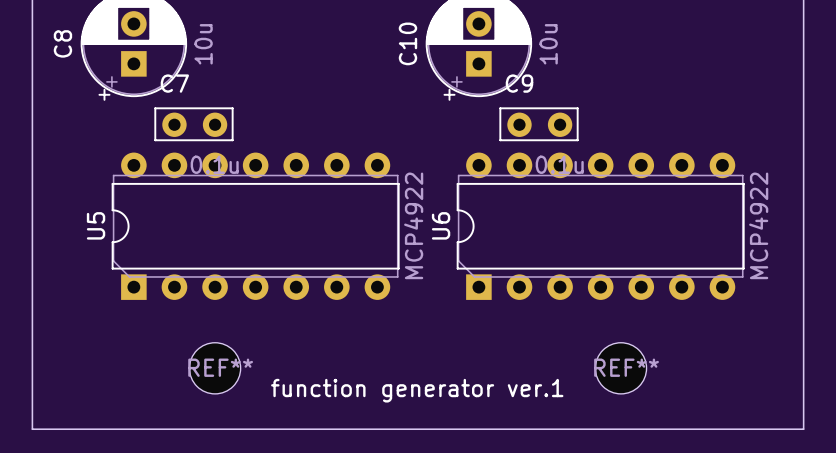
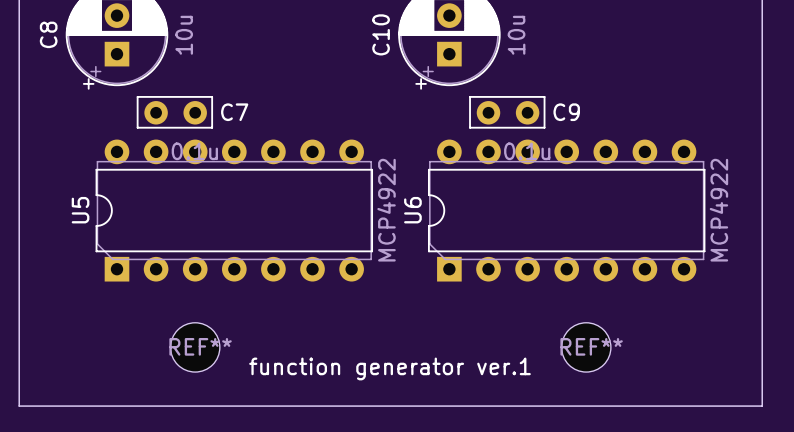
C7 name position: C7 (174, 83) -> C7 (234, 112)
C9 name position: C9 (519, 83) -> C9 (566, 112)

